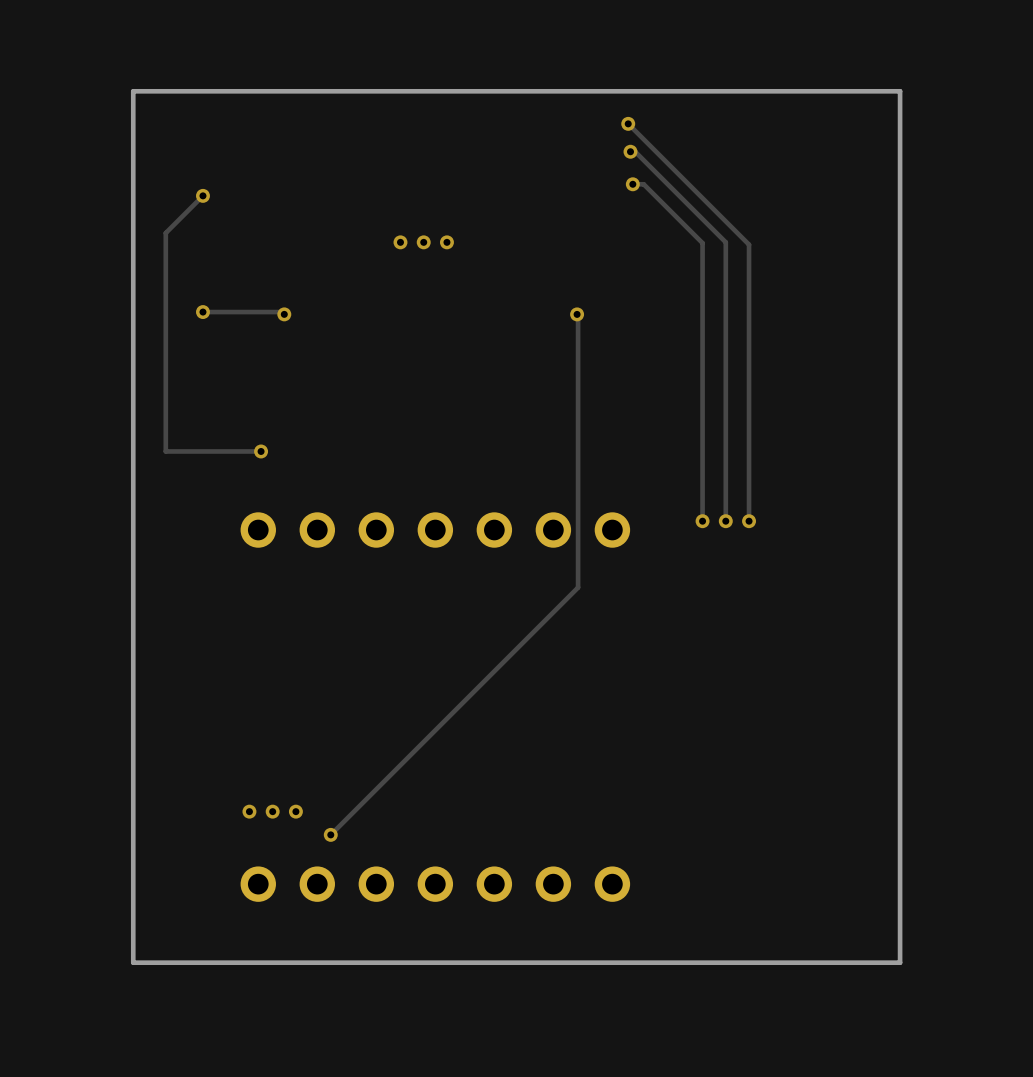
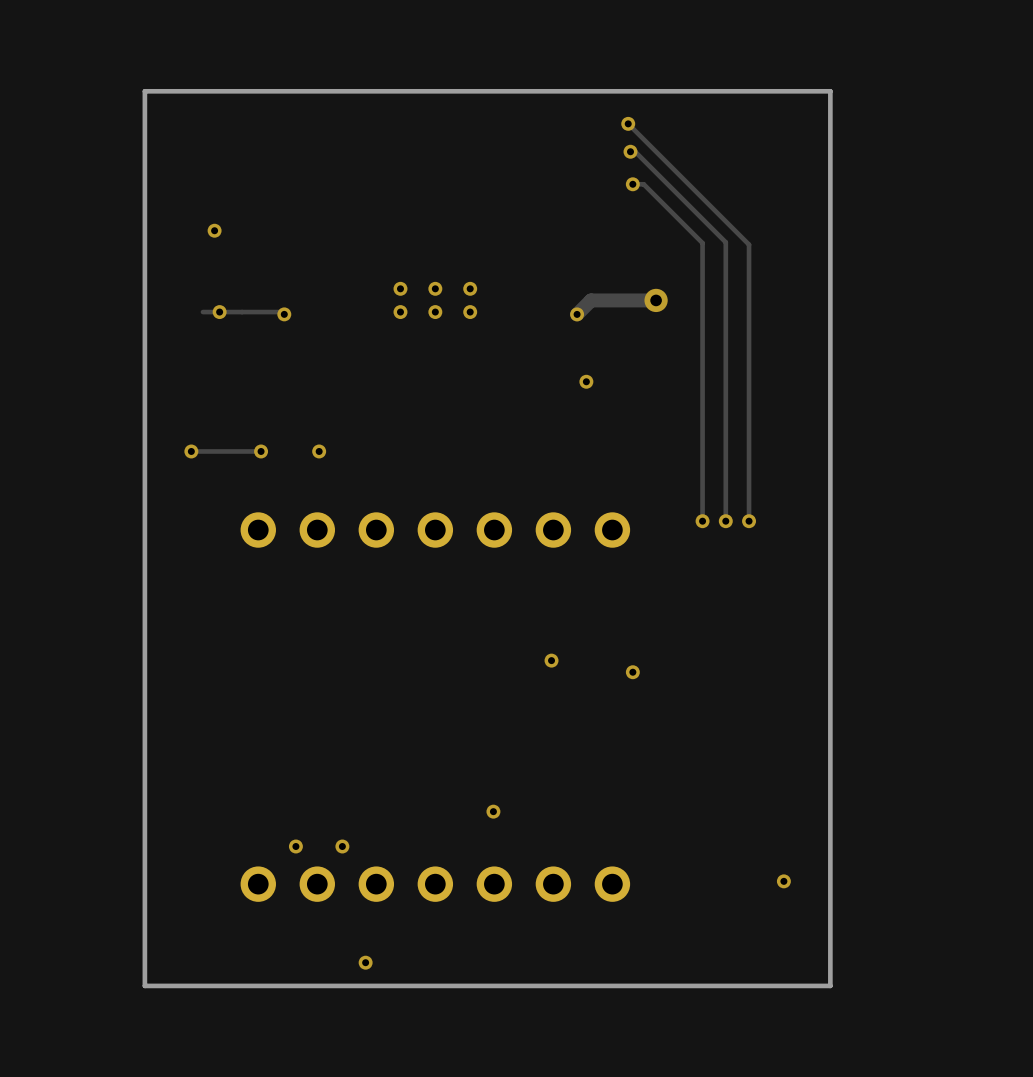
board edge: (830, 91) (900, 91) (900, 962) (133, 962) (133, 91) (144, 91) -> (830, 91) (830, 985) (144, 985) (144, 91)
track: (202, 195) (165, 233) (165, 451) (191, 451) -> none
via position: (202, 195) -> (214, 230)
via: (400, 242) -> none
via: (423, 242) -> none
via: (446, 242) -> none
via: none -> (400, 288)
via: none -> (435, 288)
via: none -> (470, 288)
via: none -> (656, 300)
via position: (202, 312) -> (219, 312)
via: none -> (400, 312)
via: none -> (435, 312)
via: none -> (470, 312)
track: (577, 314) (578, 587) (330, 834) -> (577, 314) (591, 300) (656, 300)
via: none -> (586, 381)
via: none -> (191, 451)
via: none -> (319, 451)
via: none -> (551, 660)
via: none -> (632, 672)
via: (249, 811) -> none
via: (272, 811) -> none
via: (295, 811) -> none
via: none -> (493, 811)
via position: (330, 834) -> (342, 846)
via: none -> (295, 846)
via: none -> (783, 881)
via: none -> (365, 962)

